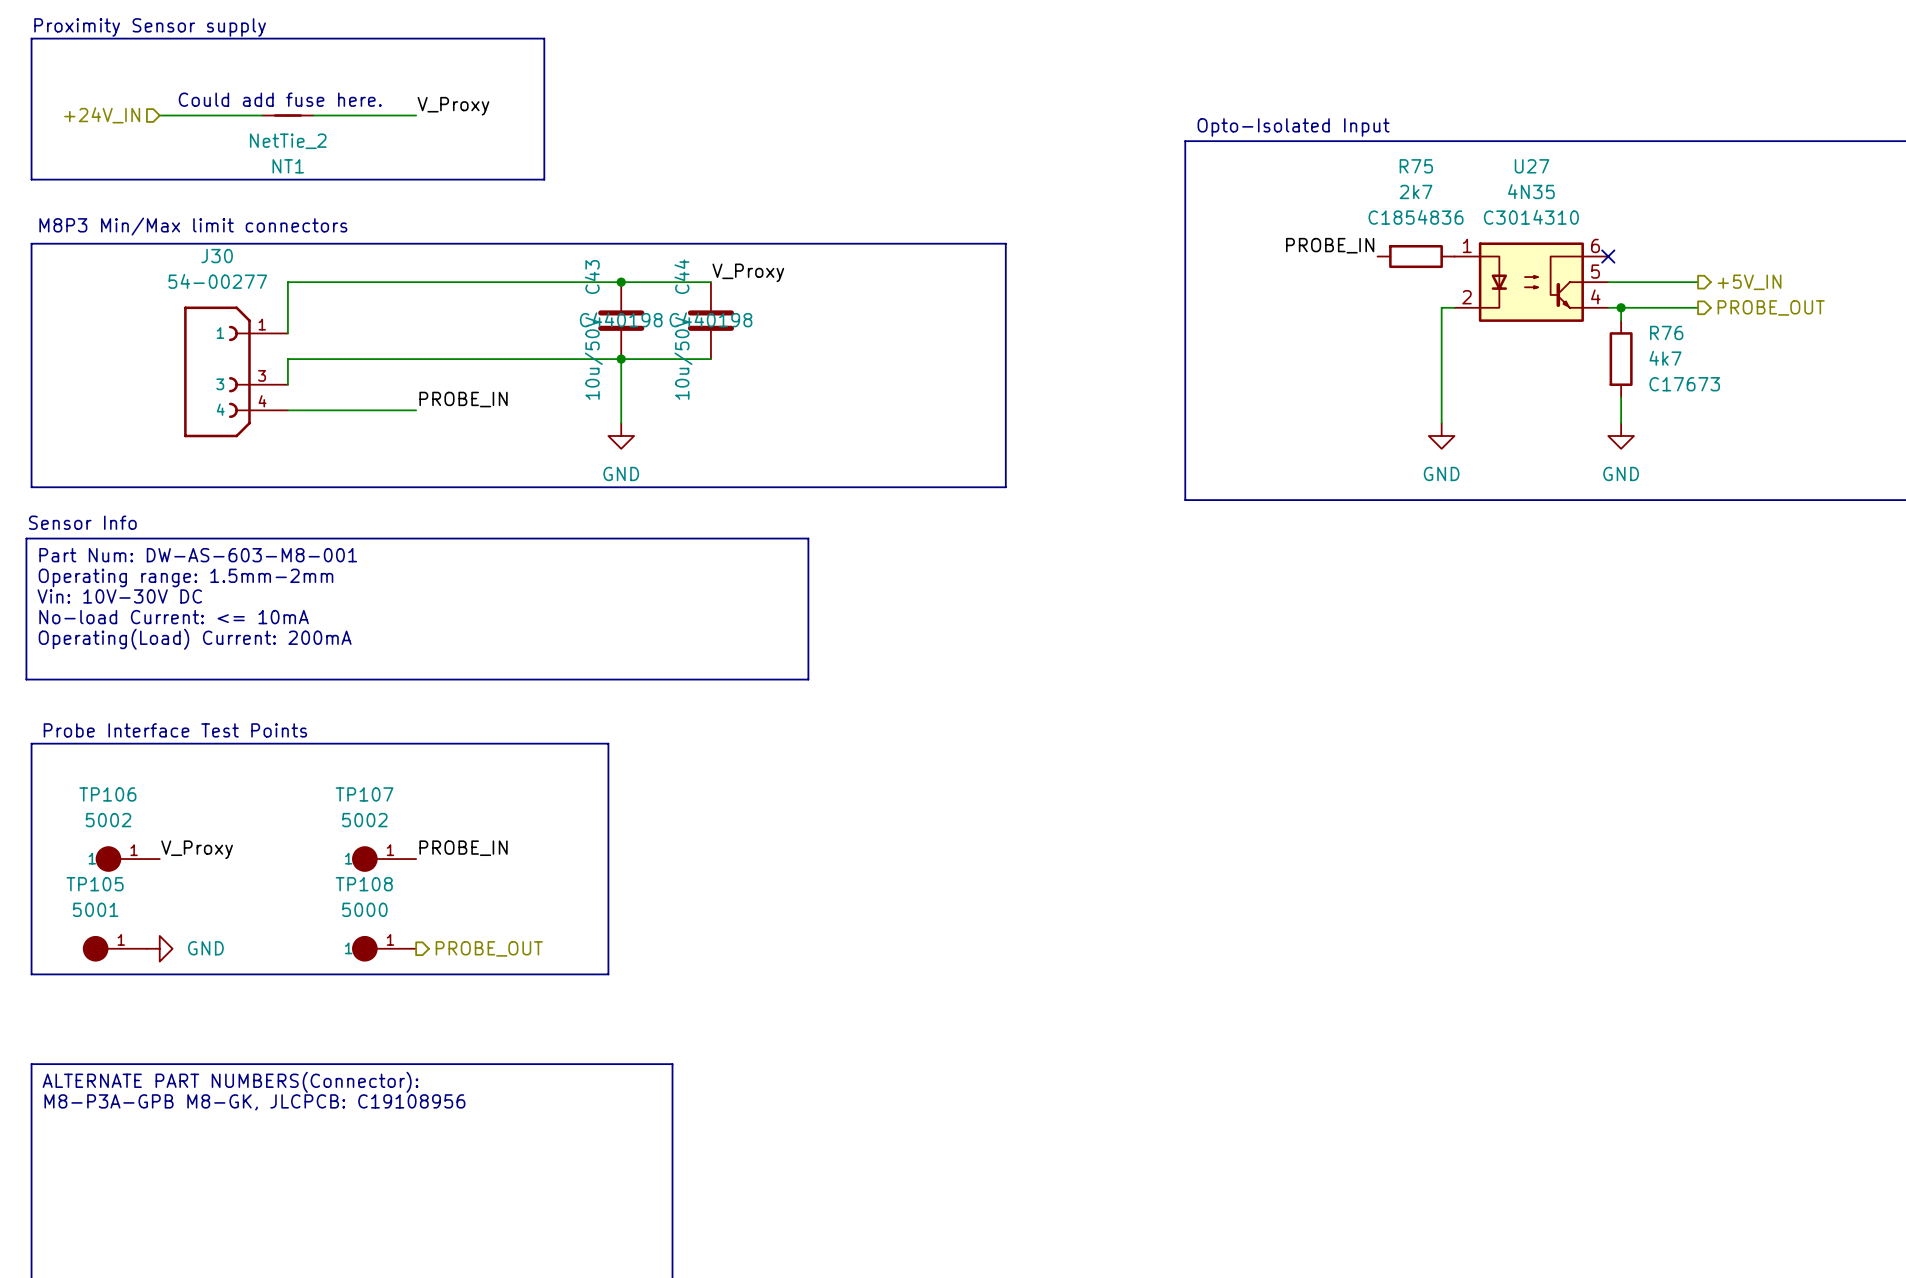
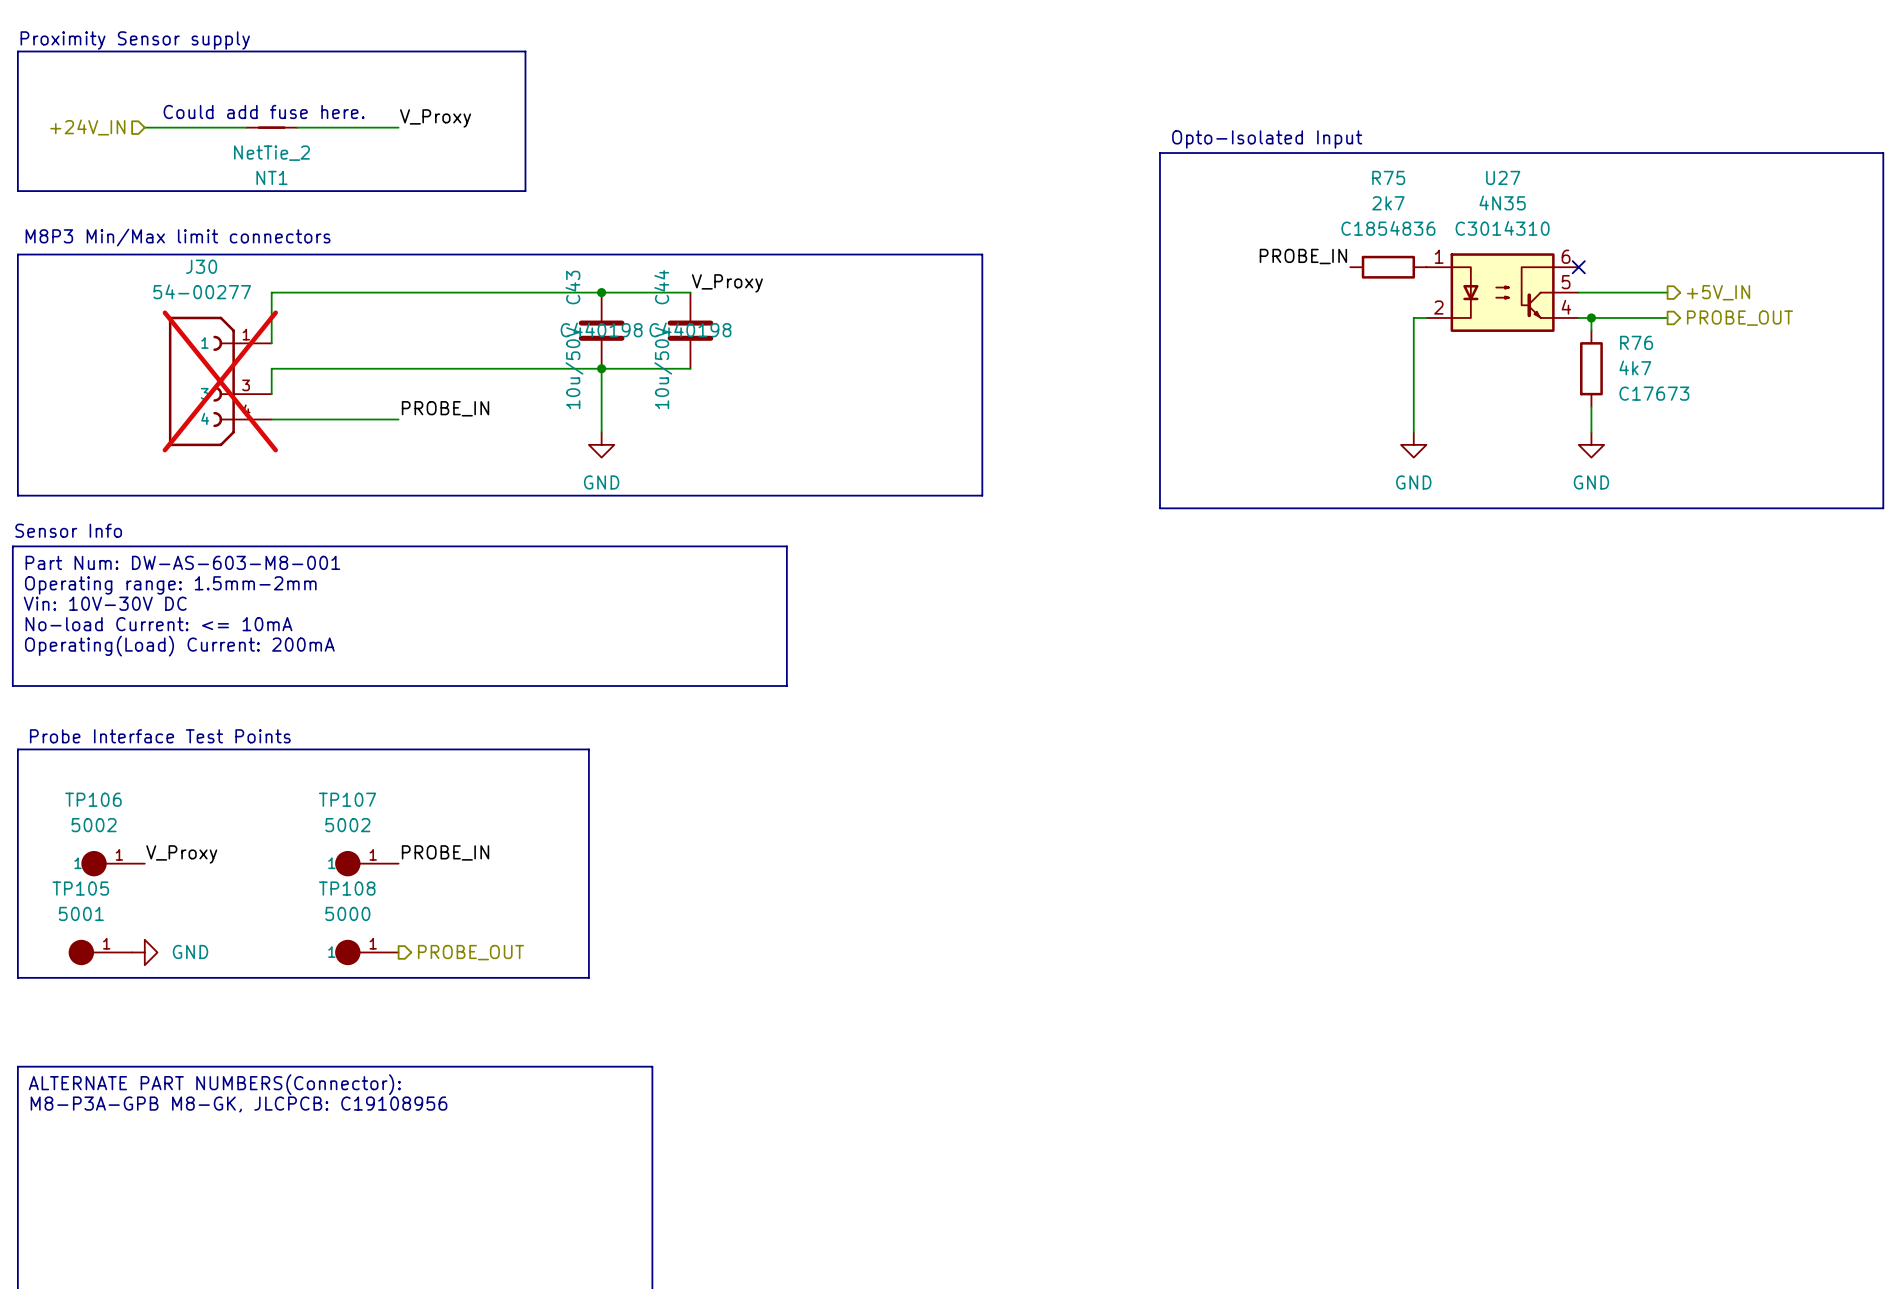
J30 do-not-place cross: none -> (220, 381)

